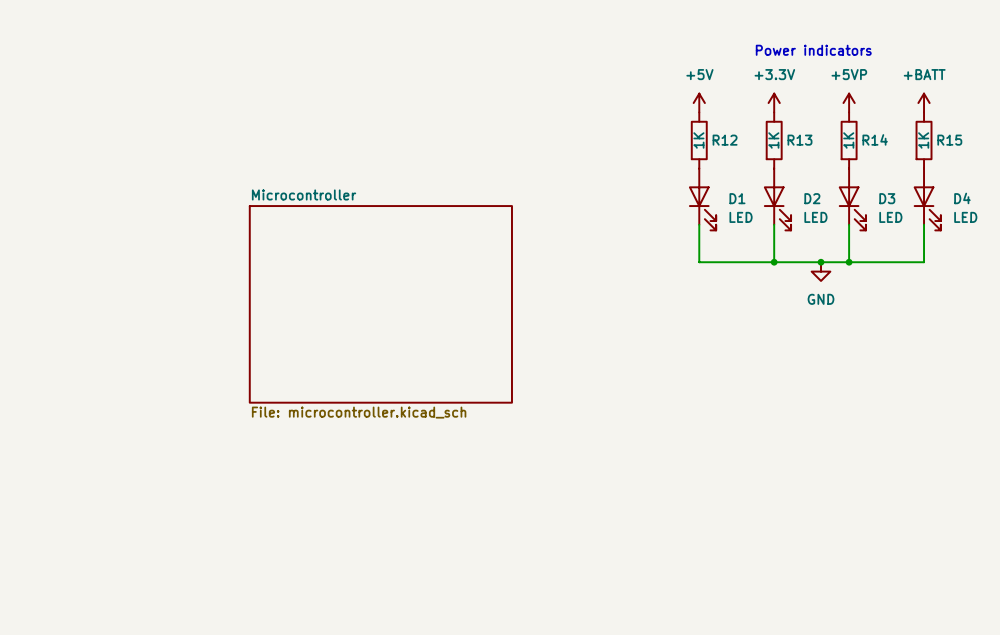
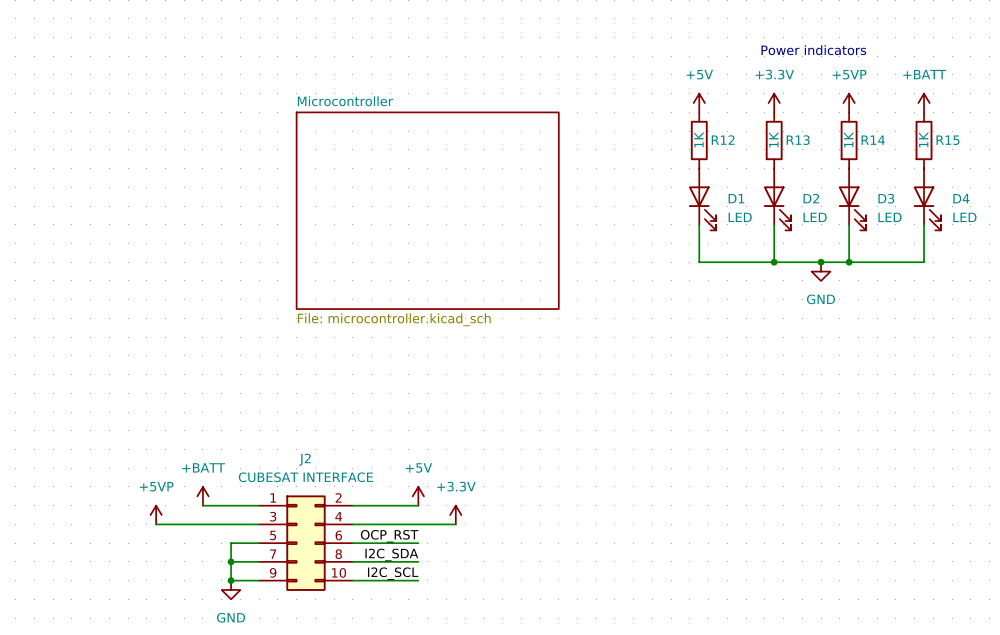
sheet Microcontroller position: (380, 304) -> (427, 210)
power symbol: none -> +BATT (202, 496)
power symbol: none -> +5V (418, 496)
wire: none -> (202, 505) (259, 505)
wire: none -> (352, 505) (418, 505)
power symbol: none -> +5VP (156, 515)
power symbol: none -> +3.3V (455, 515)
wire: none -> (156, 524) (259, 524)
wire: none -> (352, 524) (455, 524)
label: none -> OCP_RST (389, 536)
wire: none -> (259, 543) (231, 543) (231, 580) (259, 580)
J2: none -> CUBESAT INTERFACE (305, 543)
wire: none -> (352, 543) (418, 543)
label: none -> I2C_SDA (391, 554)
wire: none -> (231, 561) (259, 561)
junction: none -> (231, 561)
wire: none -> (352, 561) (418, 561)
label: none -> I2C_SCL (393, 573)
junction: none -> (231, 580)
wire: none -> (352, 580) (418, 580)
power symbol: none -> GND (231, 589)

